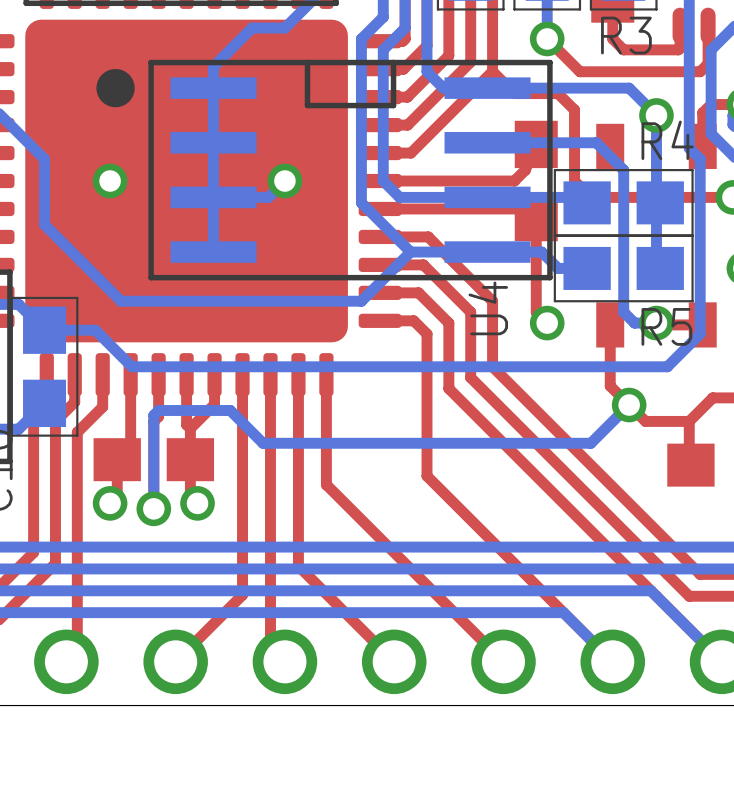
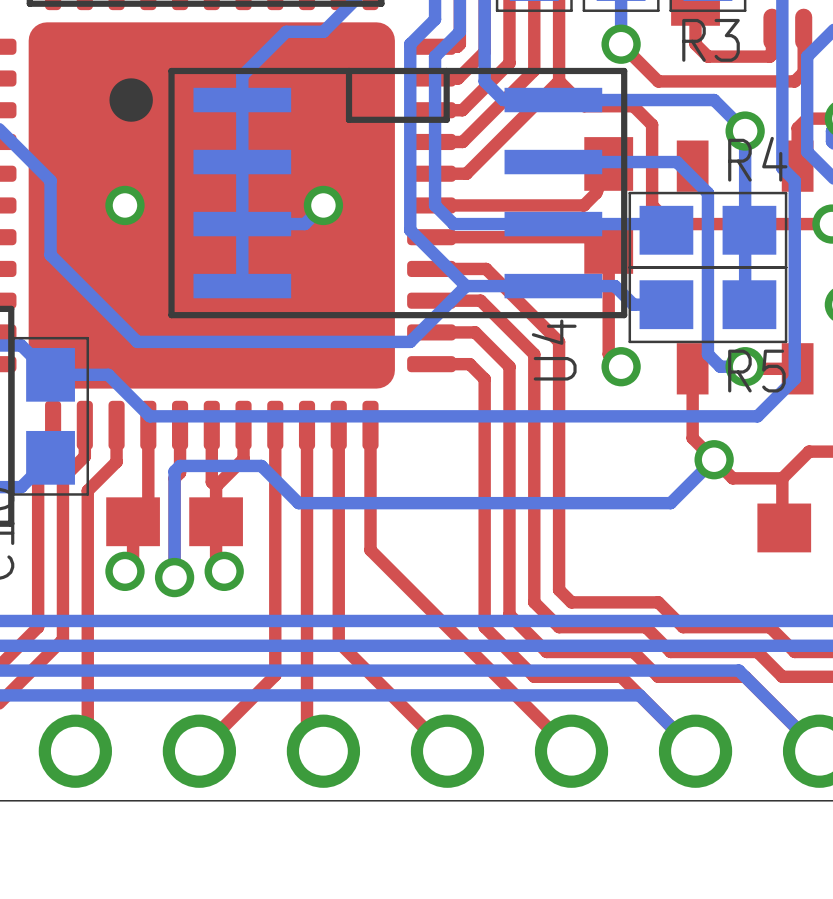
top track: (492, 366) (678, 552) -> (559, 416) (559, 589) (571, 602) (658, 602) (683, 627) (769, 627)
top track: (470, 377) (667, 574) -> (534, 428) (534, 602) (559, 627) (645, 627) (670, 651) (757, 651)
top track: (448, 388) (656, 596) -> (509, 441) (509, 614) (546, 651) (633, 651) (658, 676) (745, 676)
top track: (427, 476) (547, 596) -> (484, 540) (484, 627) (534, 676) (621, 676)

